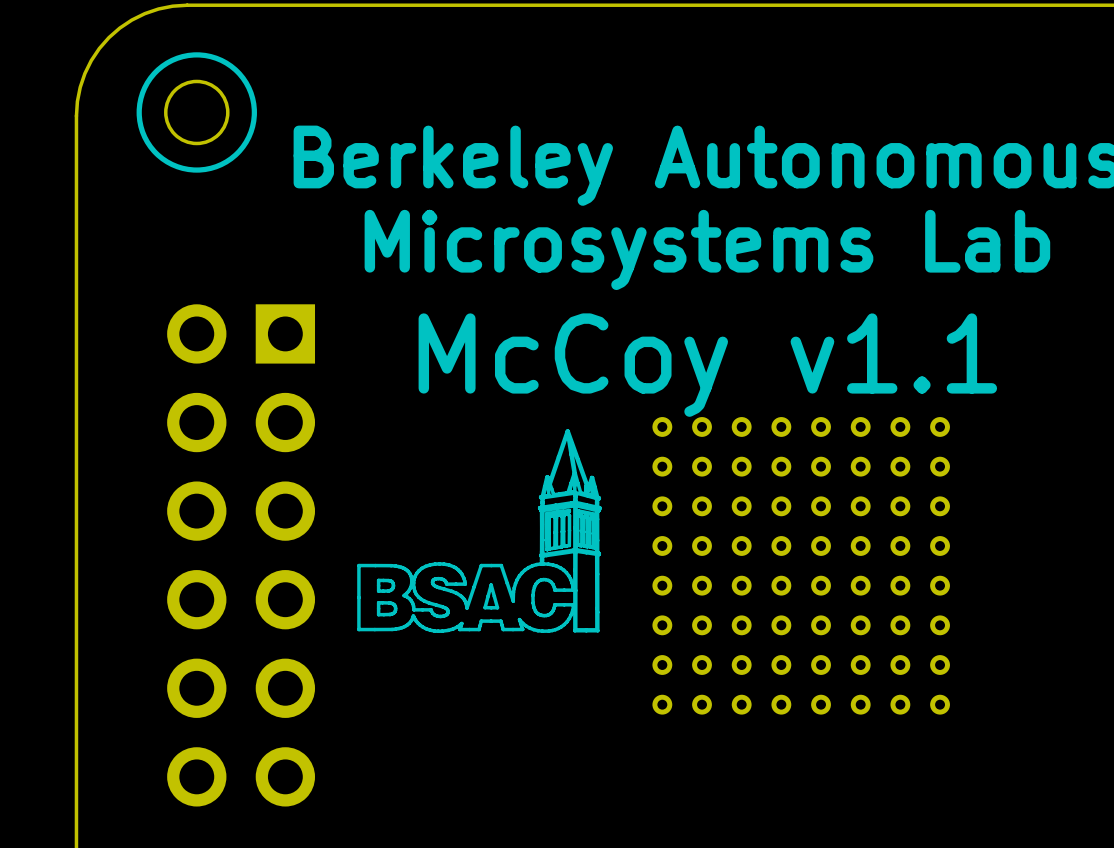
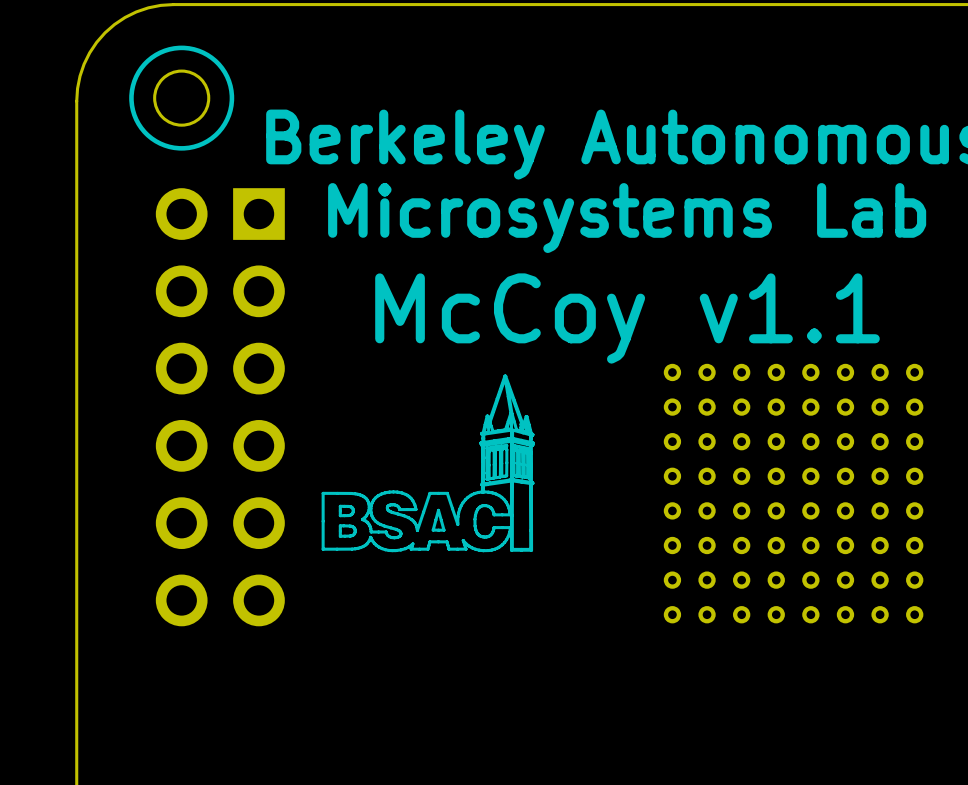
part position: (241, 555) -> (220, 407)
part position: (801, 565) -> (793, 493)

